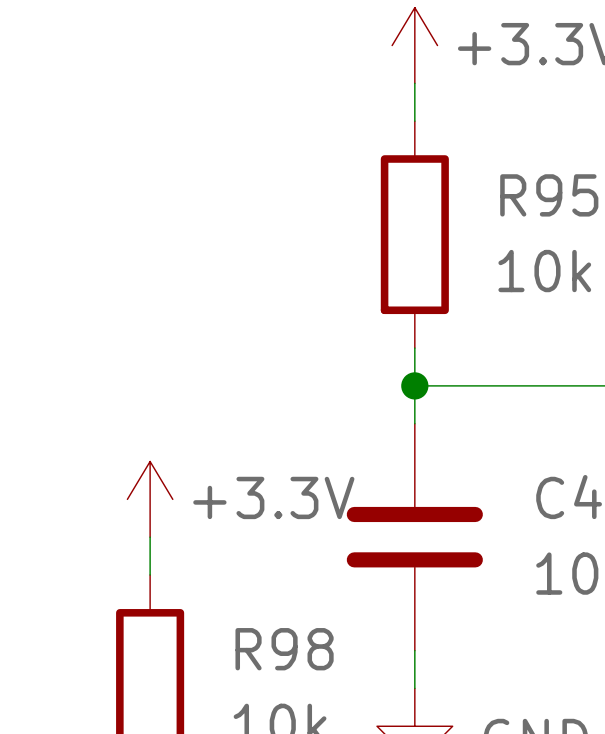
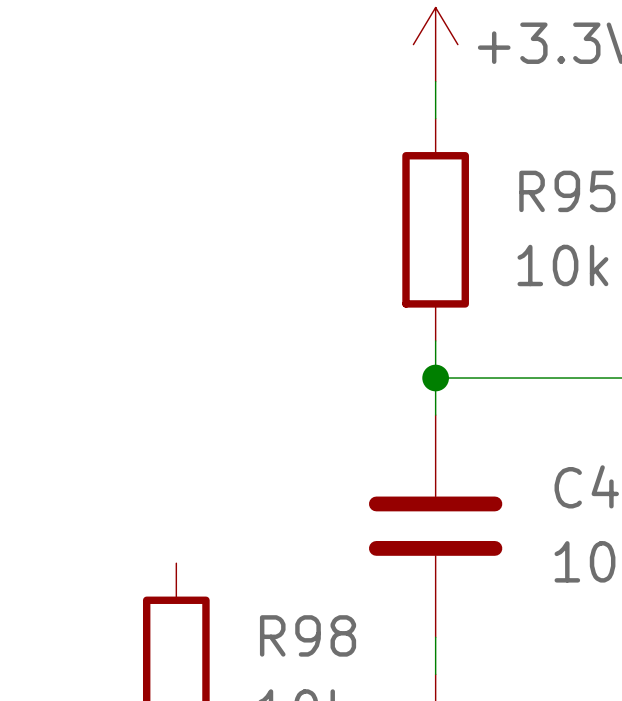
power symbol: +3.3V (150, 499) -> none
wire: (150, 537) (150, 574) -> none

